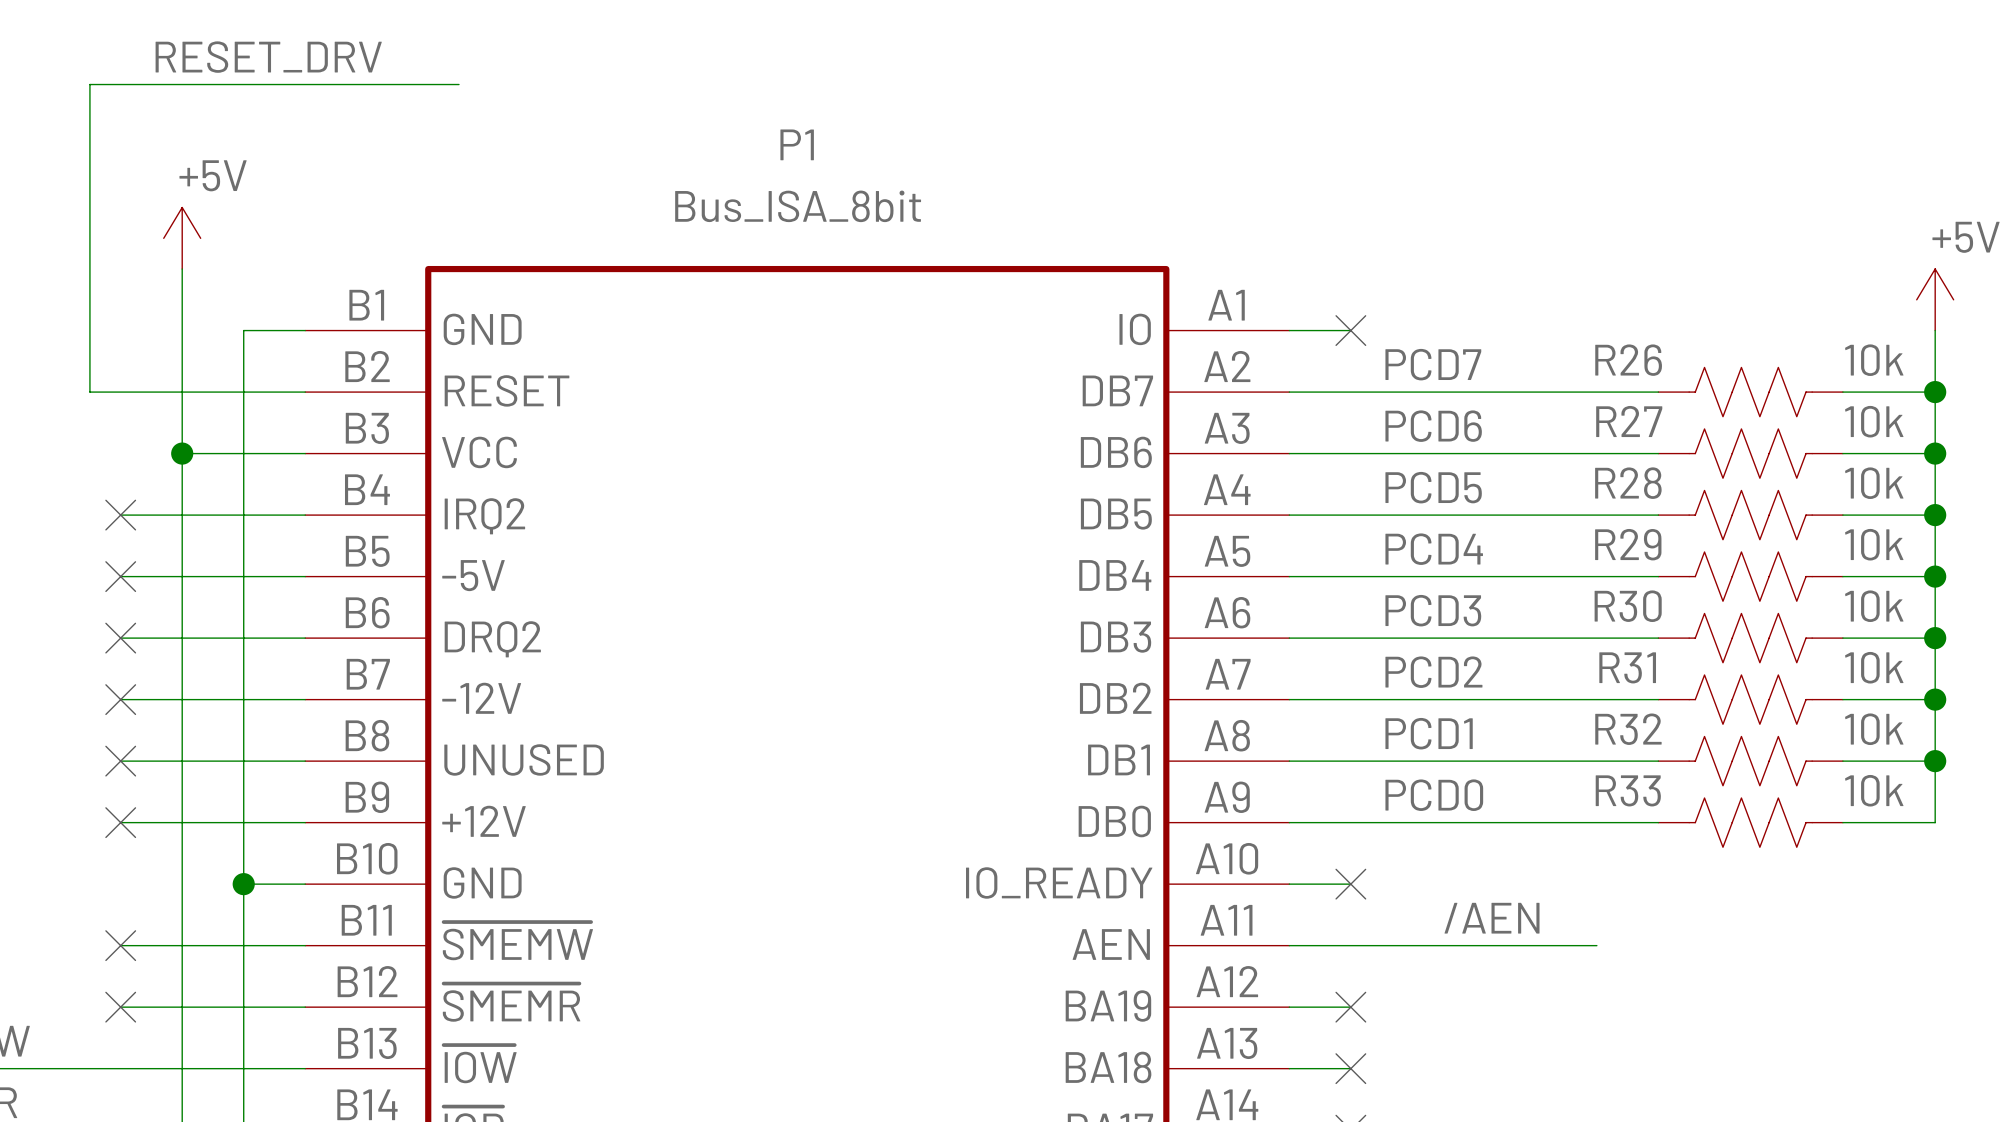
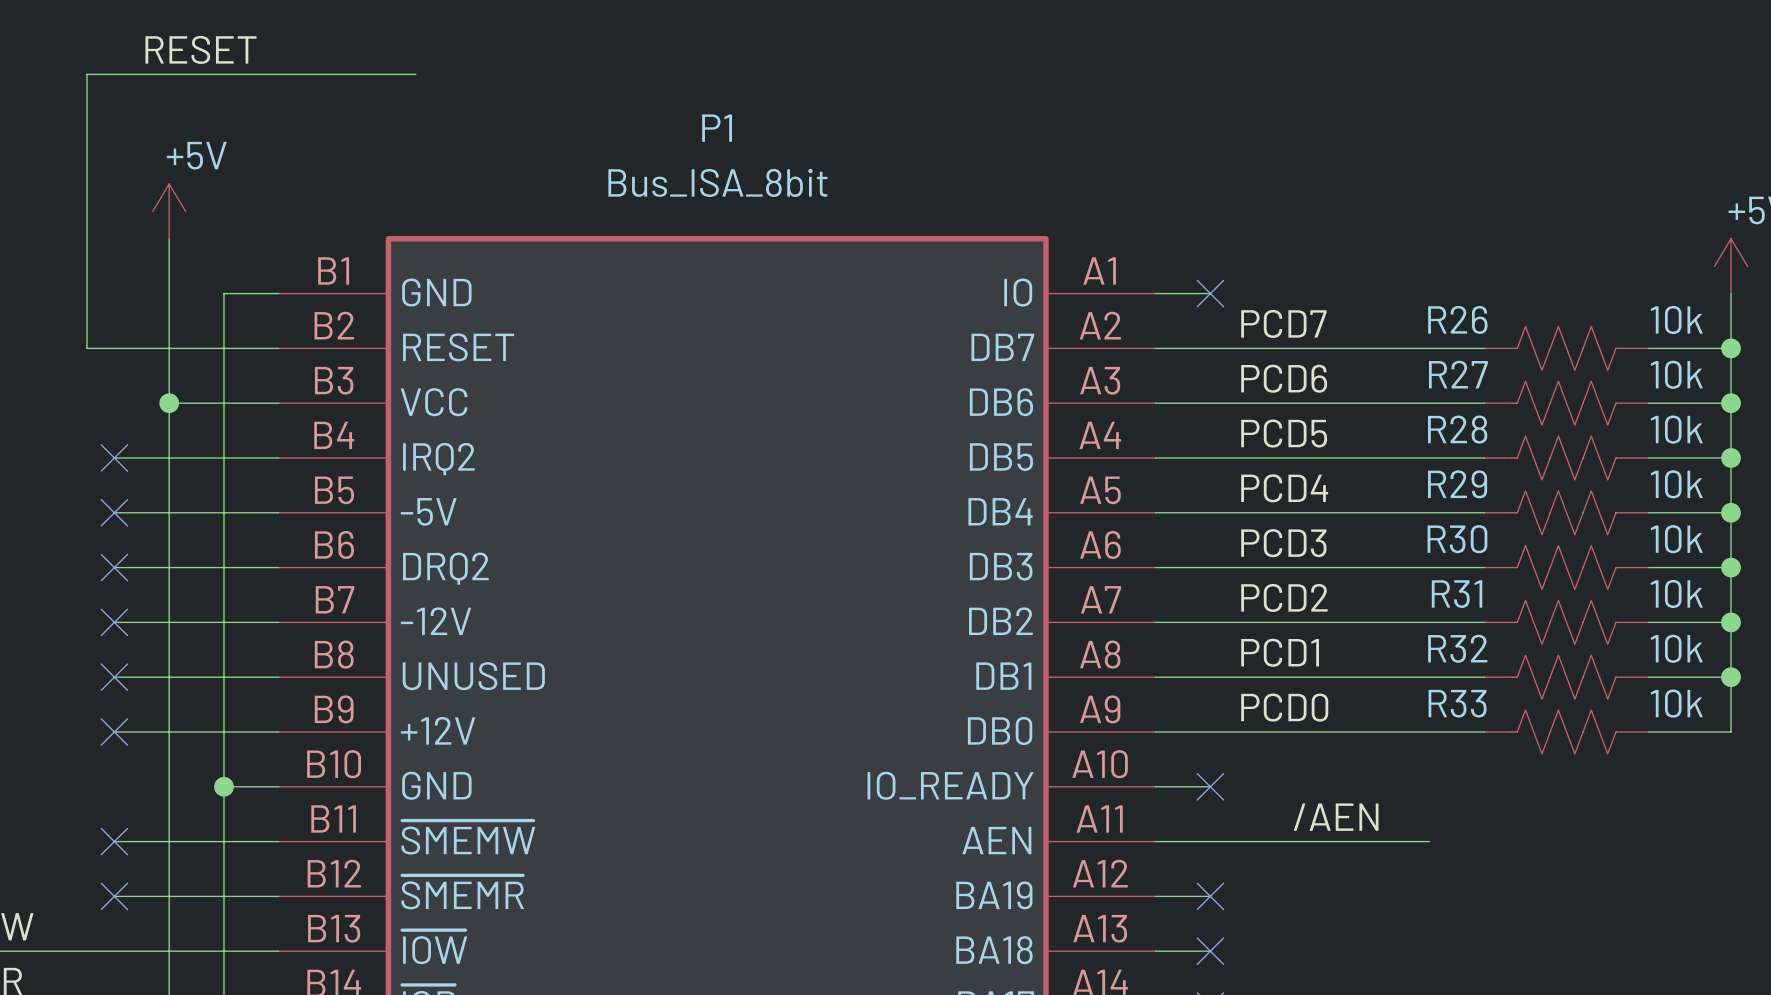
label: RESET_DRV (268, 57) -> RESET (201, 49)

